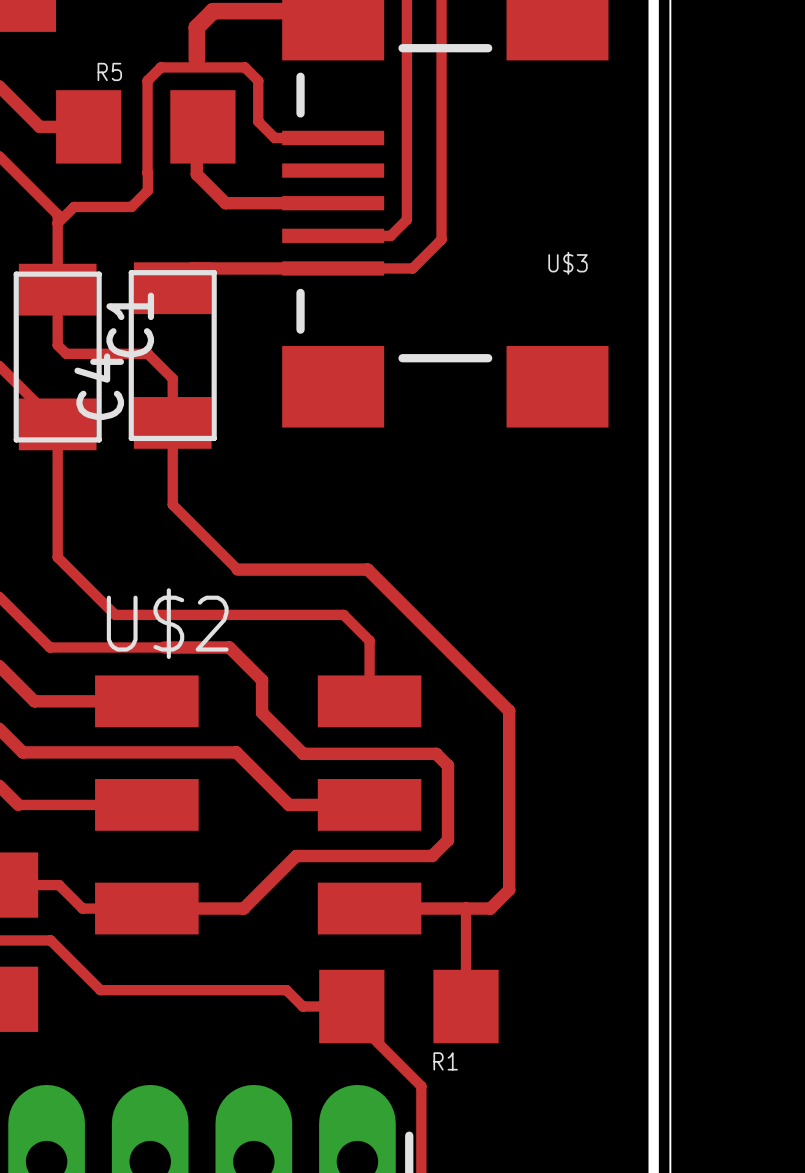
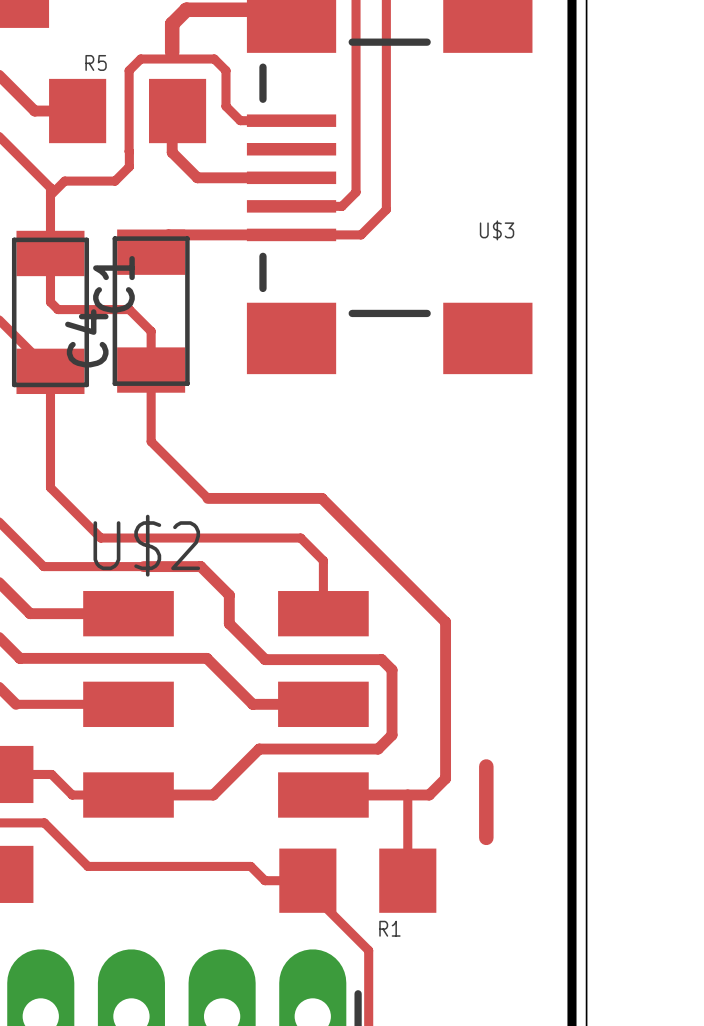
track: none -> (486, 766) (486, 837)

